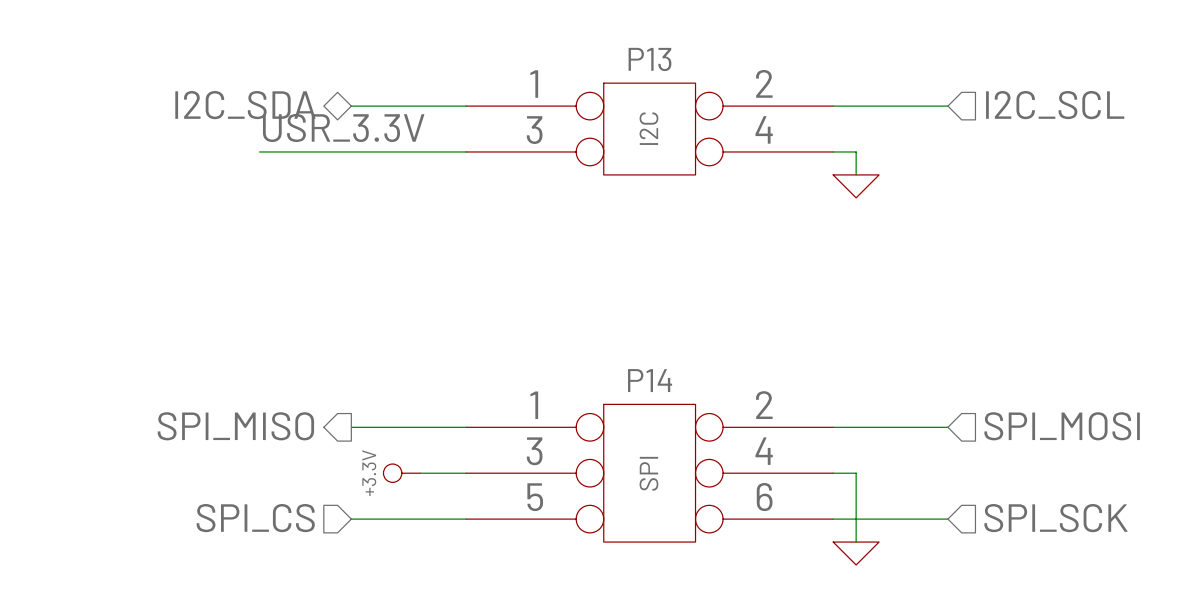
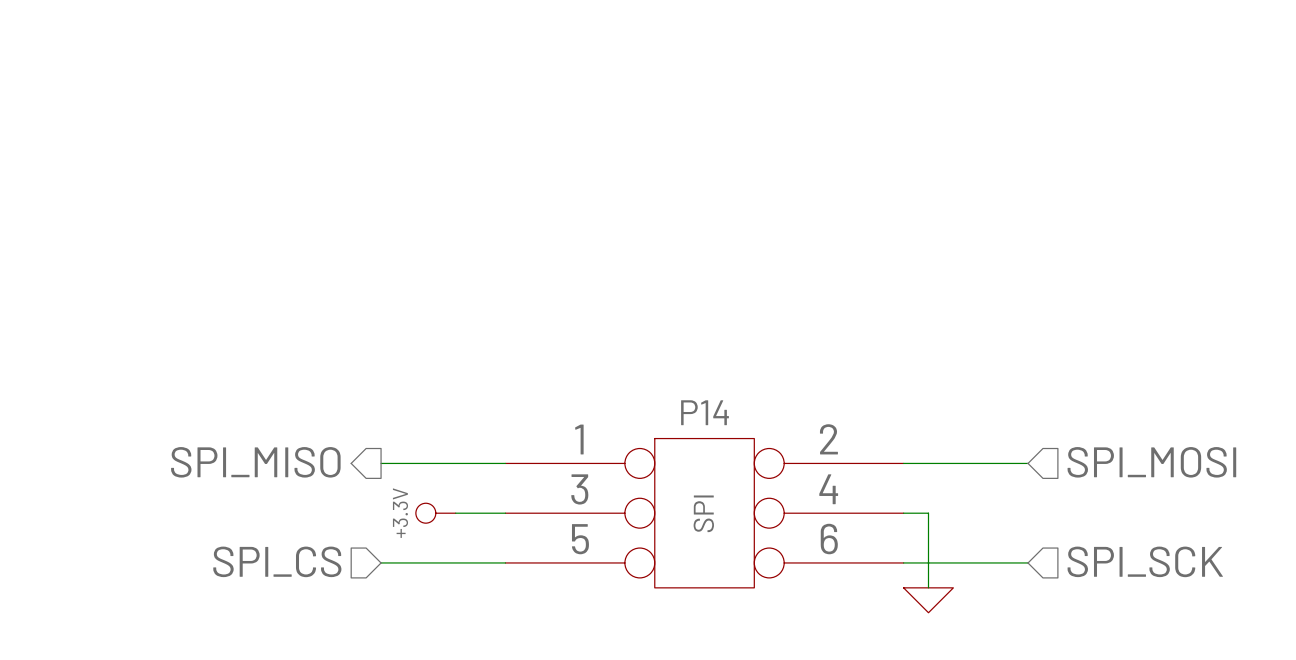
hierarchical label: I2C_SDA (245, 105) -> none
hierarchical label: I2C_SCL (1055, 105) -> none
wire: (351, 106) (466, 106) -> none
wire: (833, 106) (947, 106) -> none
label: USR_3.3V (343, 127) -> none
P13: I2C (649, 129) -> none
wire: (259, 151) (466, 151) -> none
wire: (833, 151) (856, 151) (856, 174) -> none
power symbol: (856, 186) -> none

